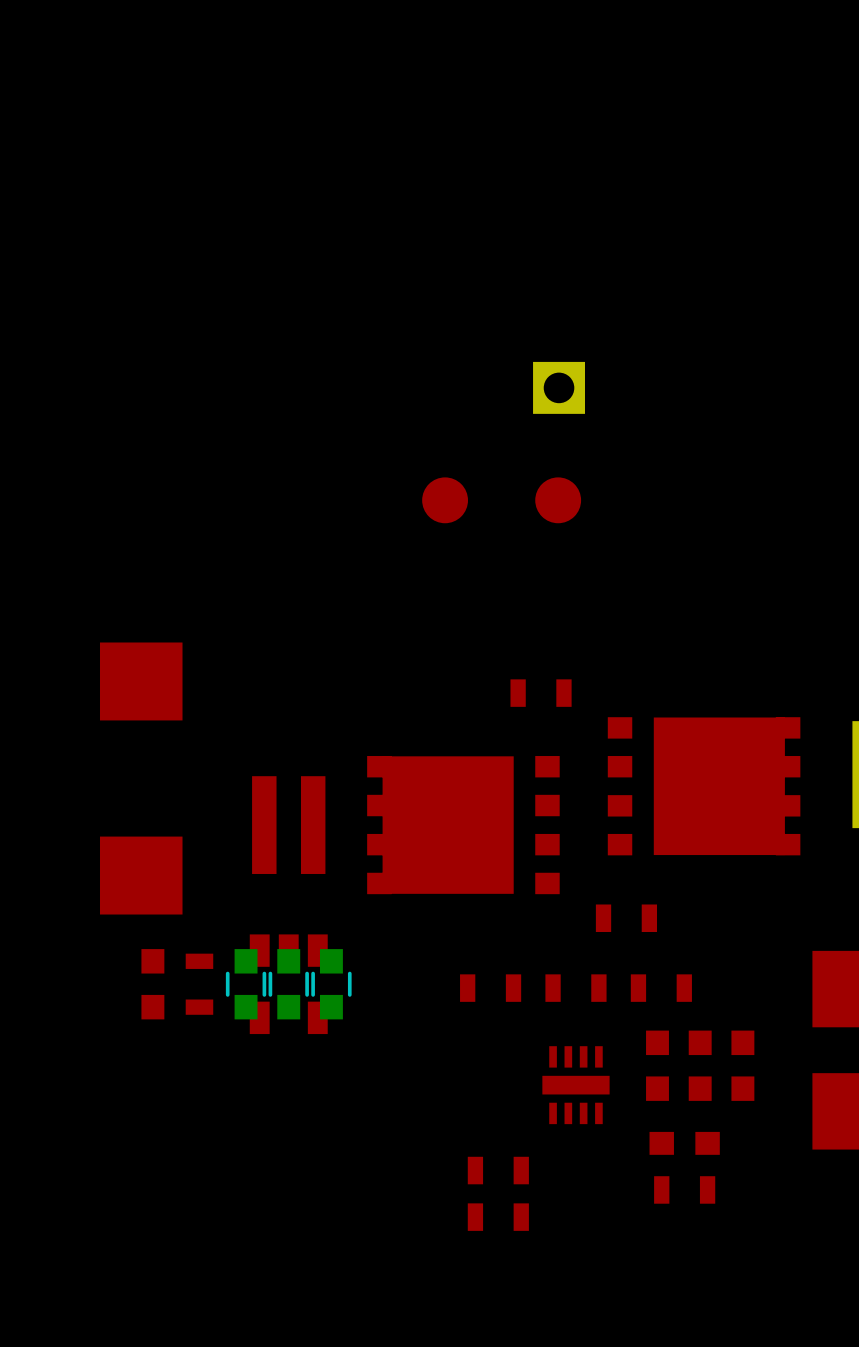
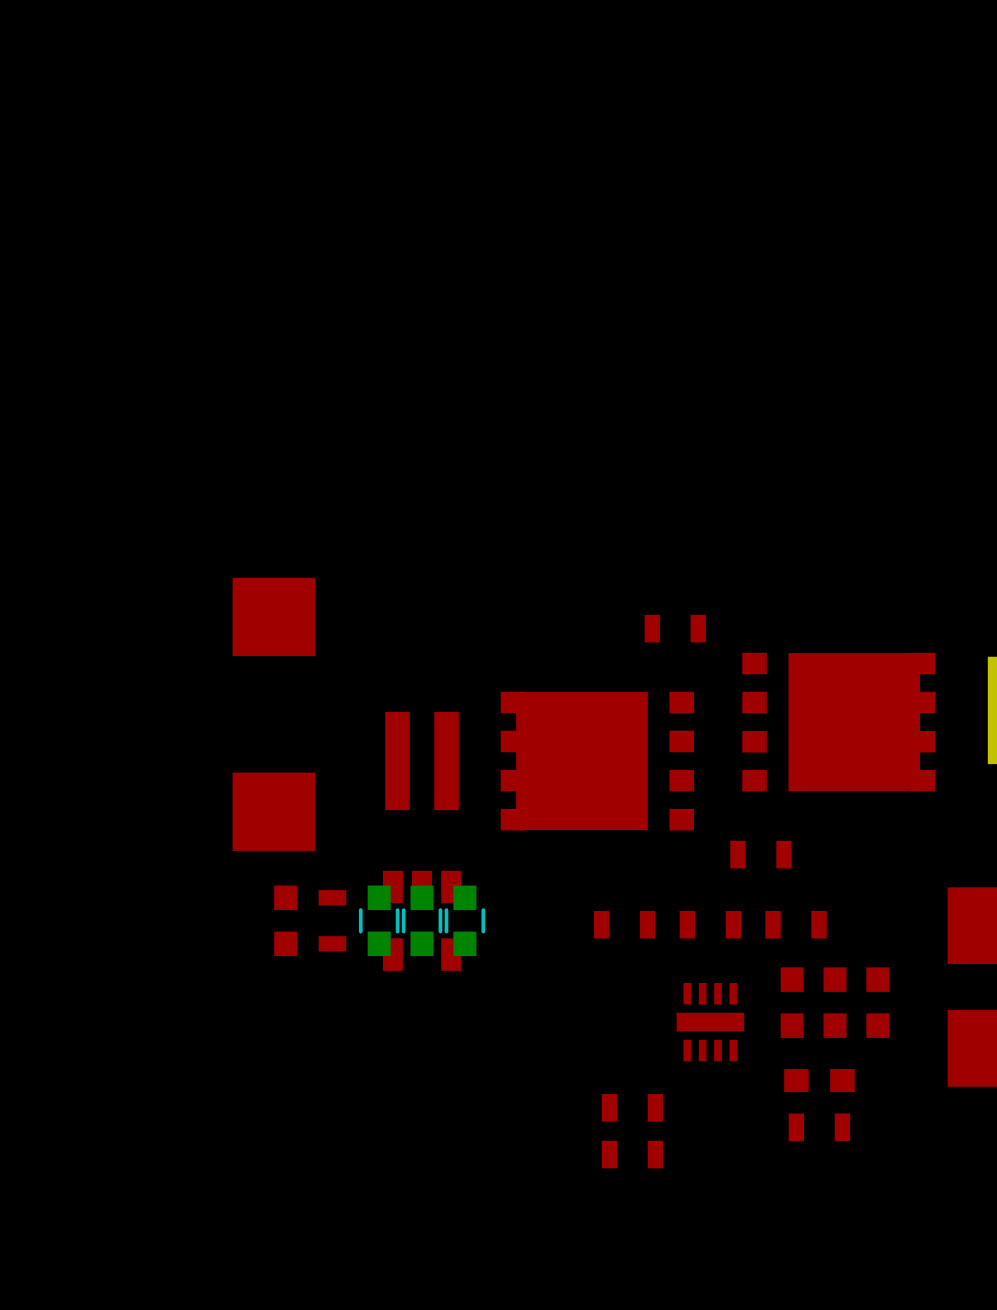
part: (559, 387) -> none
part: (445, 500) -> none
part: (558, 500) -> none

